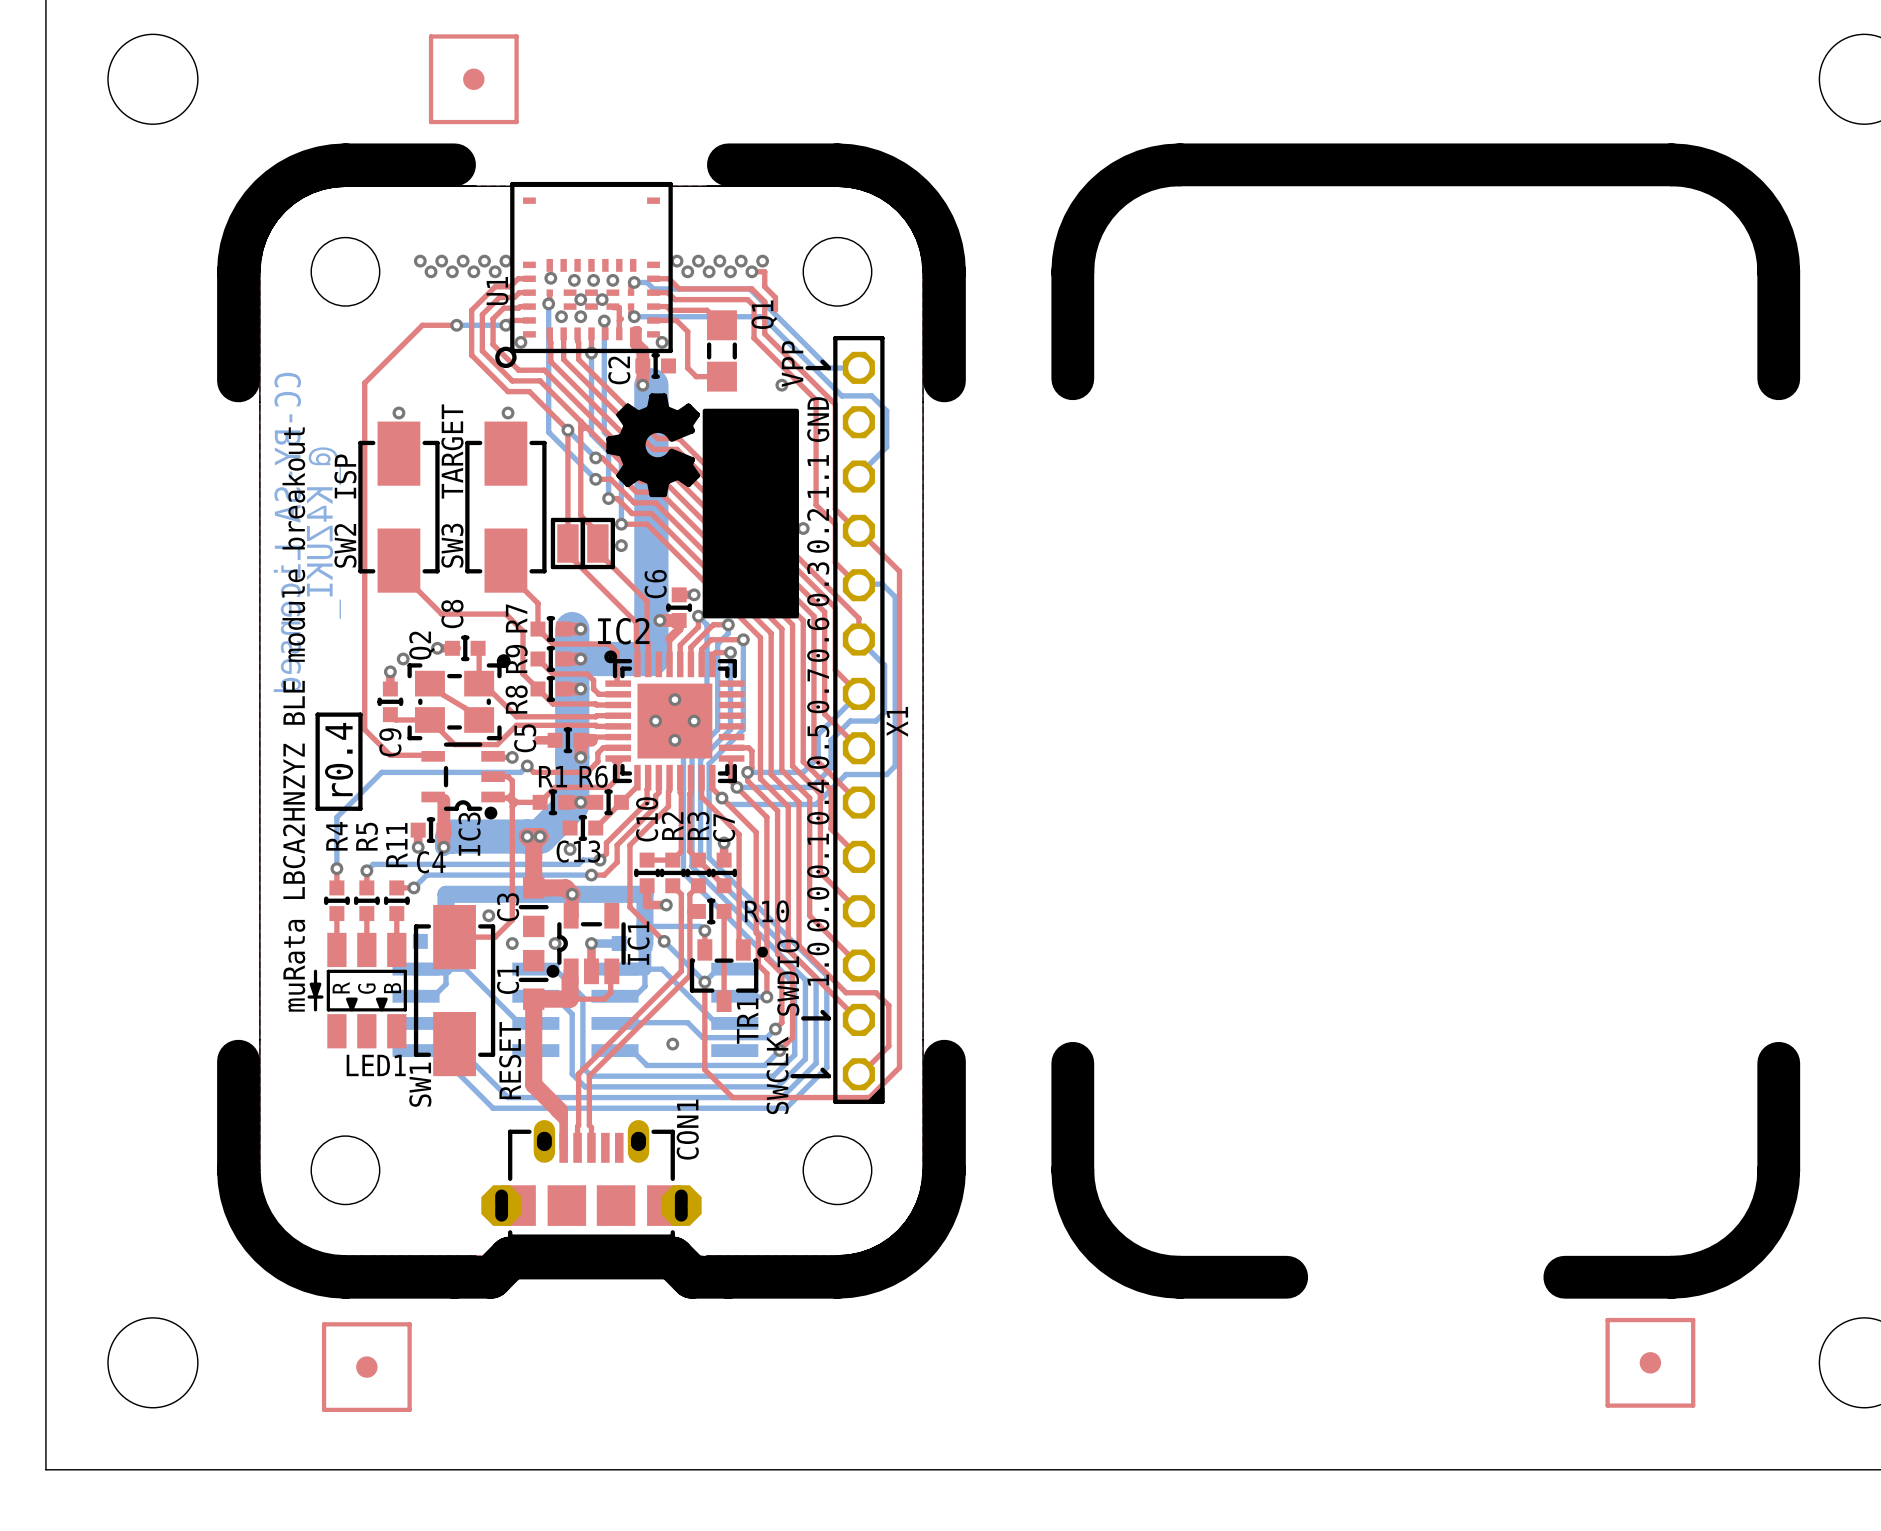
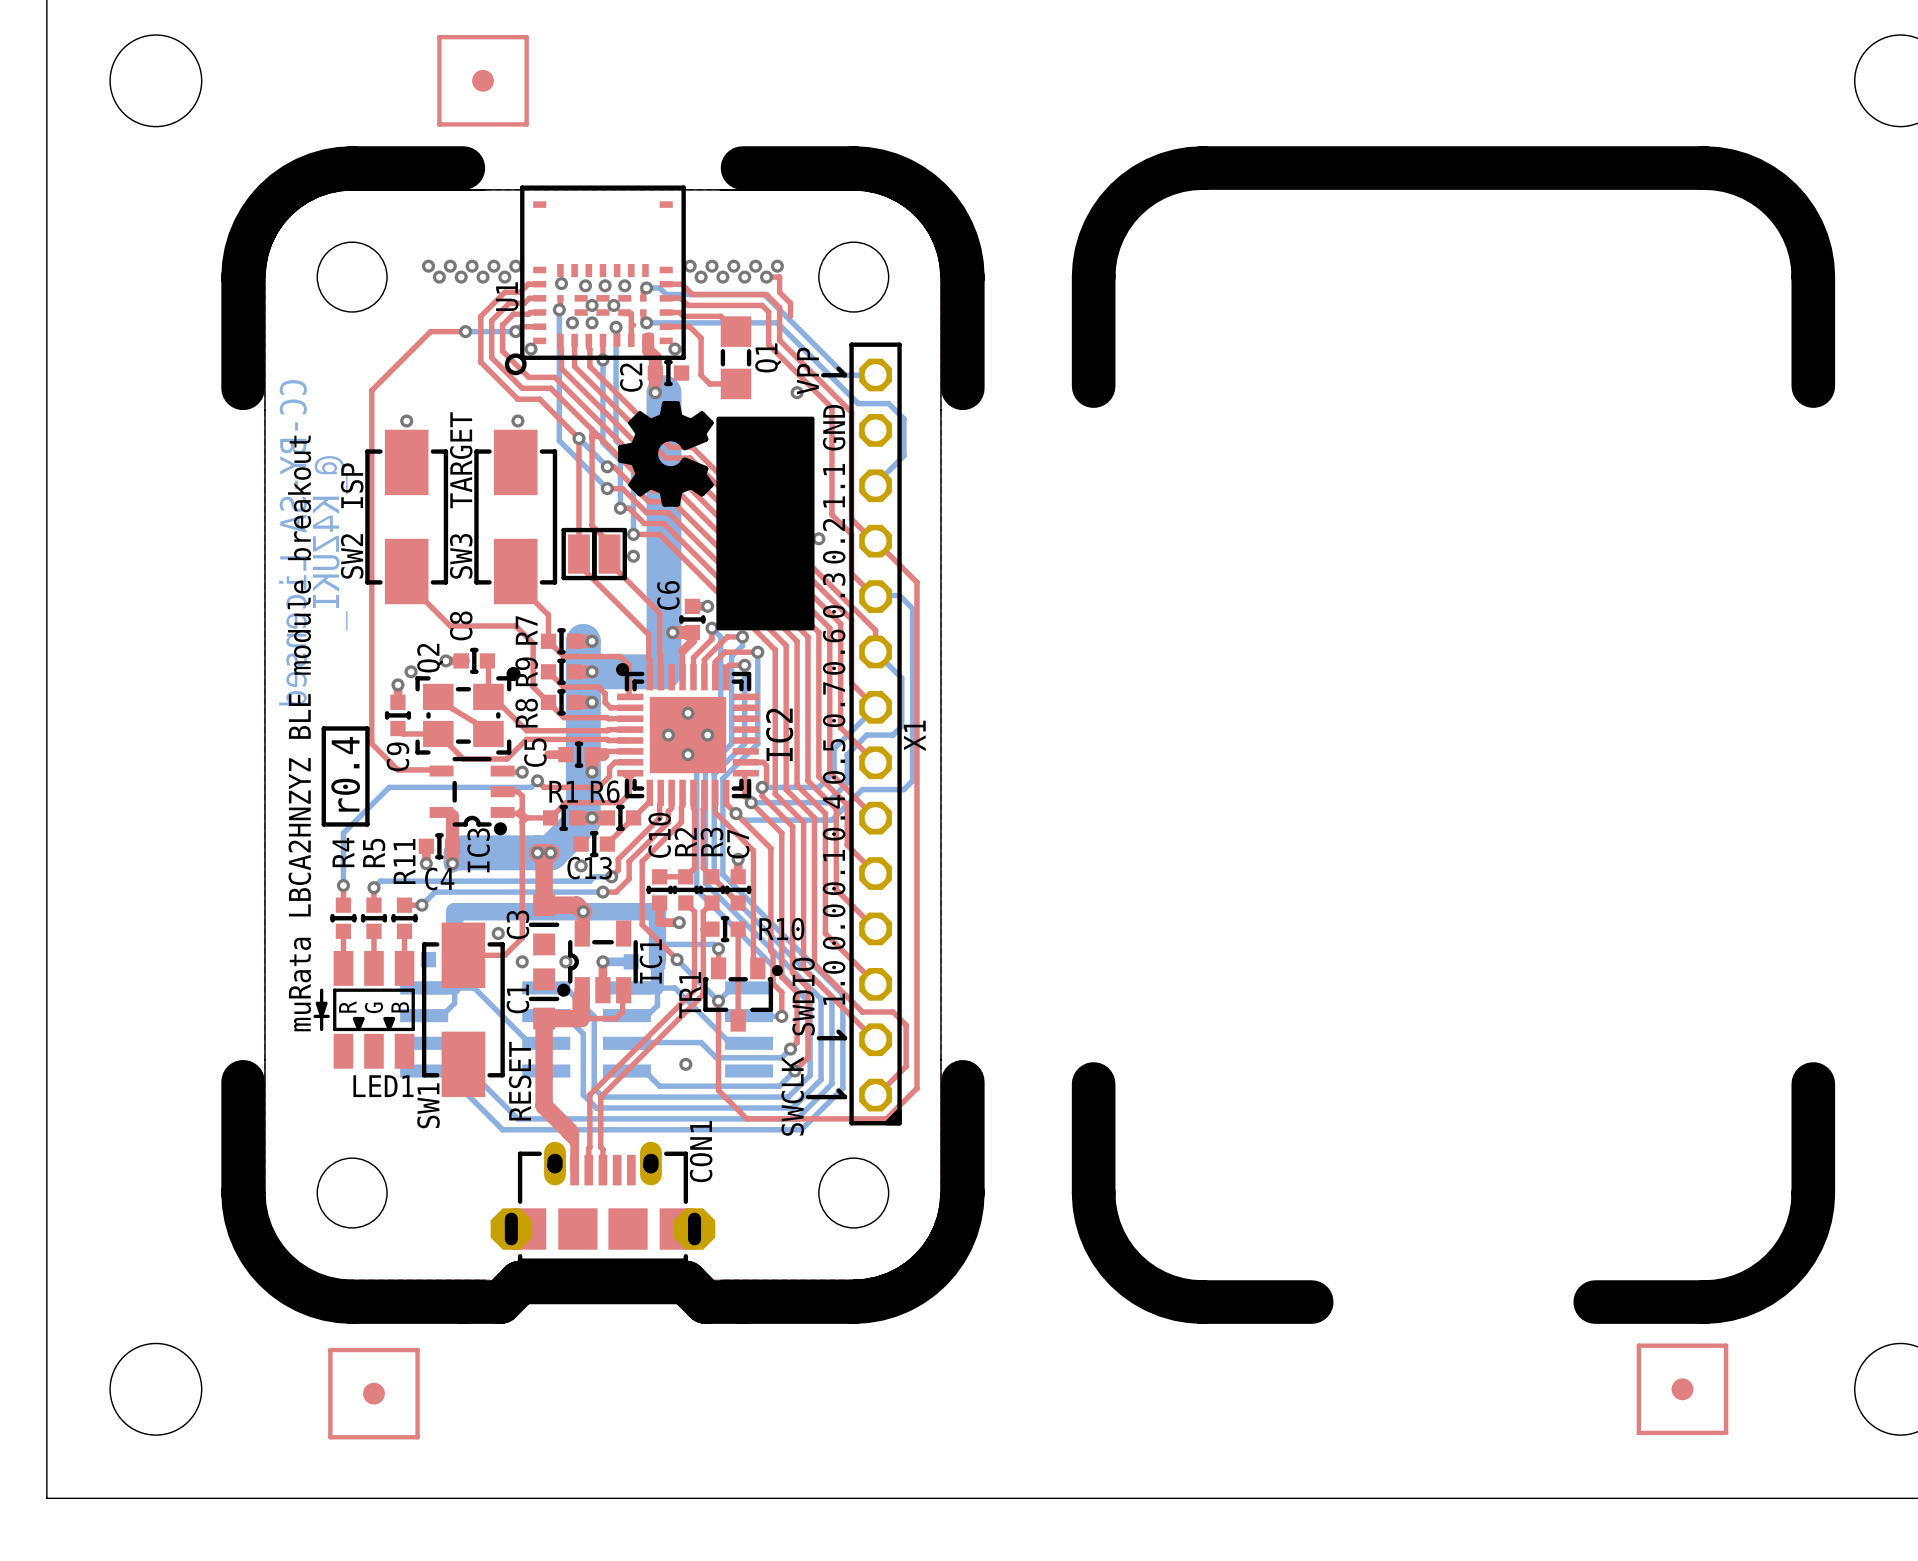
Q1 name position: Q1 (764, 314) -> Q1 (768, 357)
IC2 name rotation: 0° (623, 631) -> 90° counterclockwise (779, 734)
IC2 name position: IC2 (623, 631) -> IC2 (779, 734)
TR1 name position: TR1 (747, 1021) -> TR1 (690, 995)

